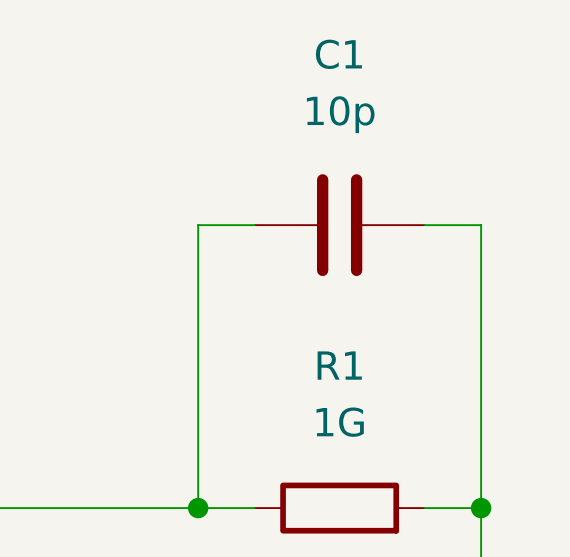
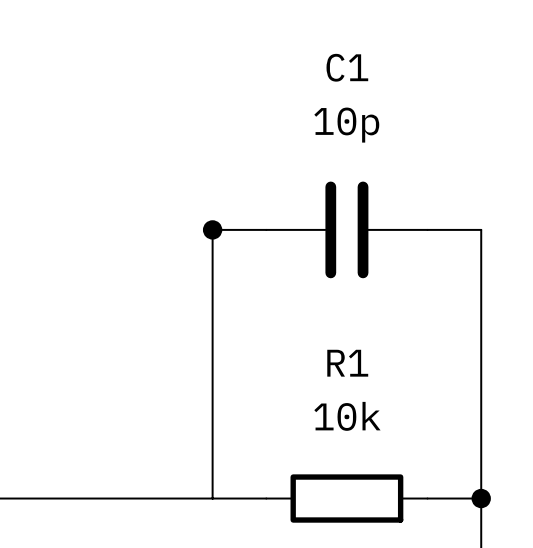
junction: none -> (212, 229)
R1 value: 1G (340, 422) -> 10k (347, 416)
junction: (198, 508) -> none

